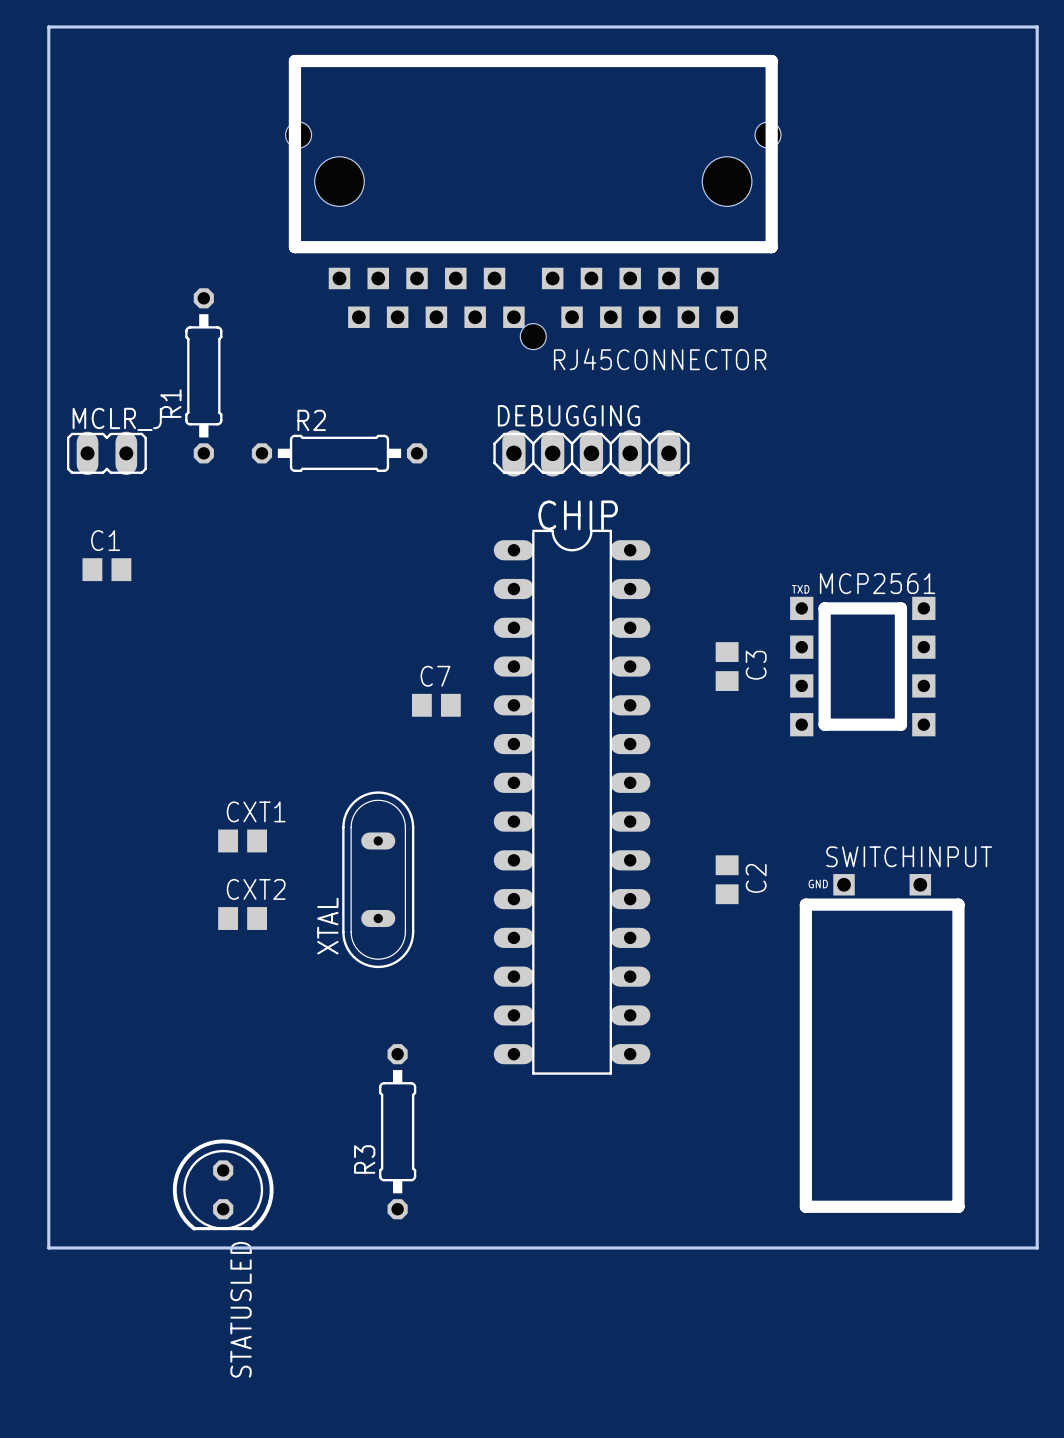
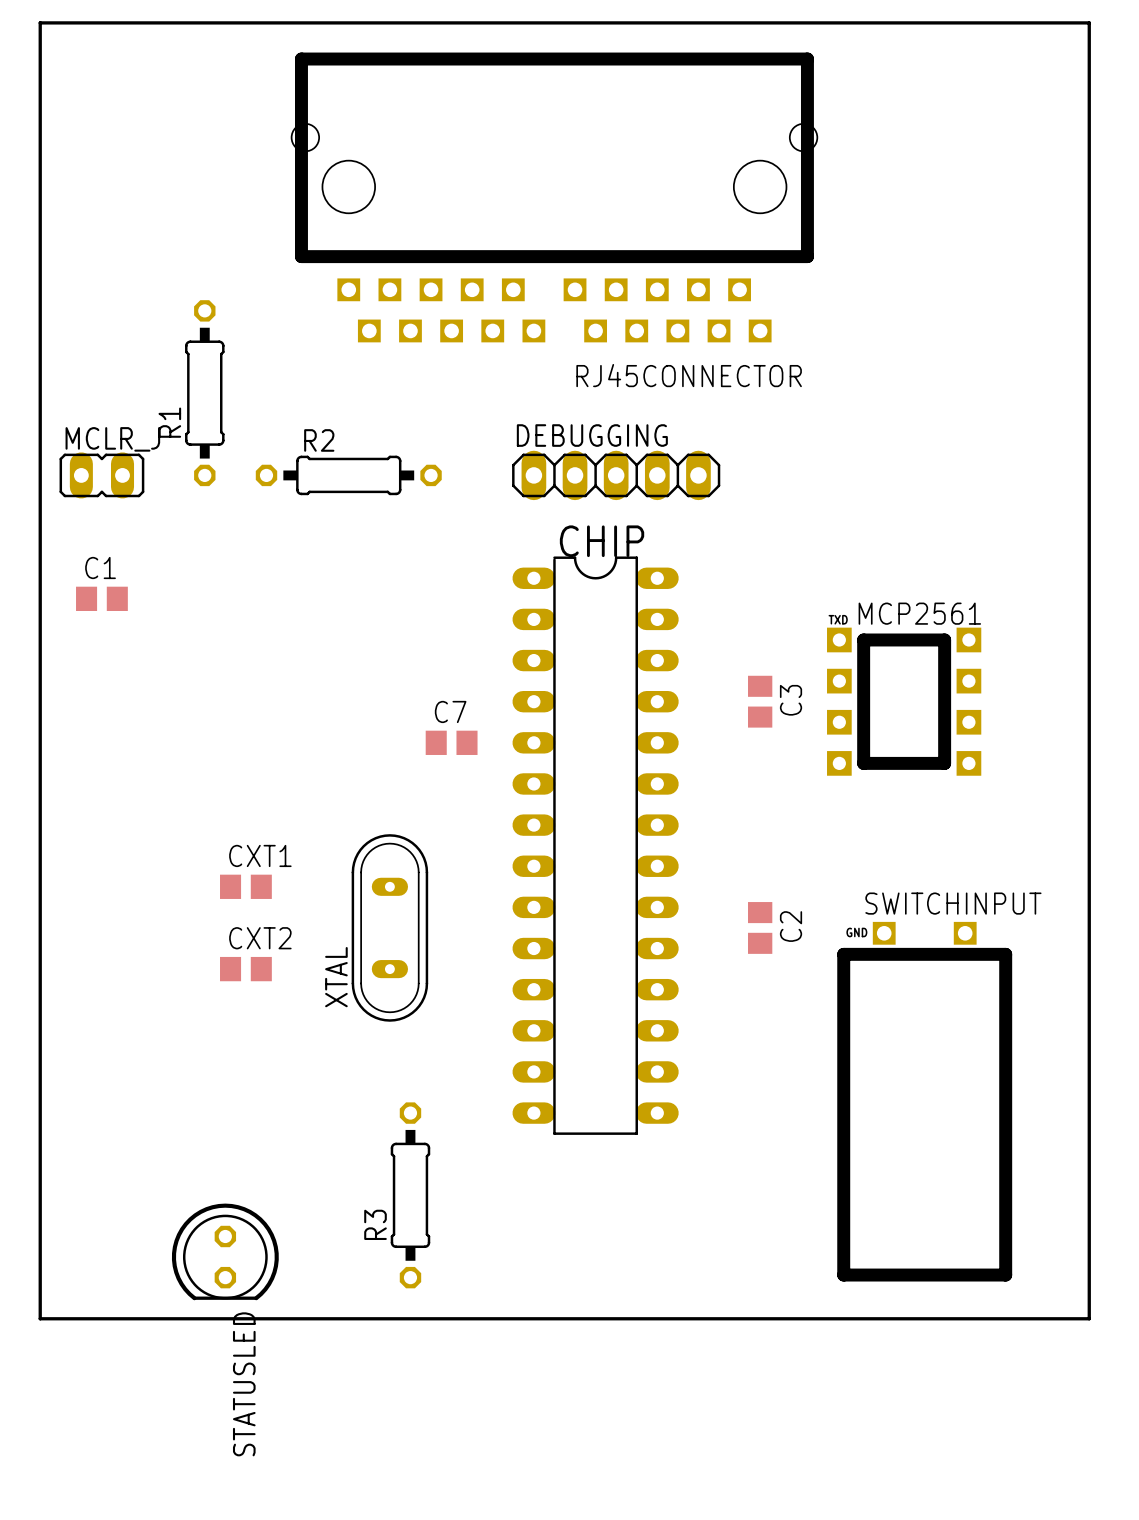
RJ45CONNECTOR footprint: [285, 54, 781, 350] -> [291, 52, 818, 343]

